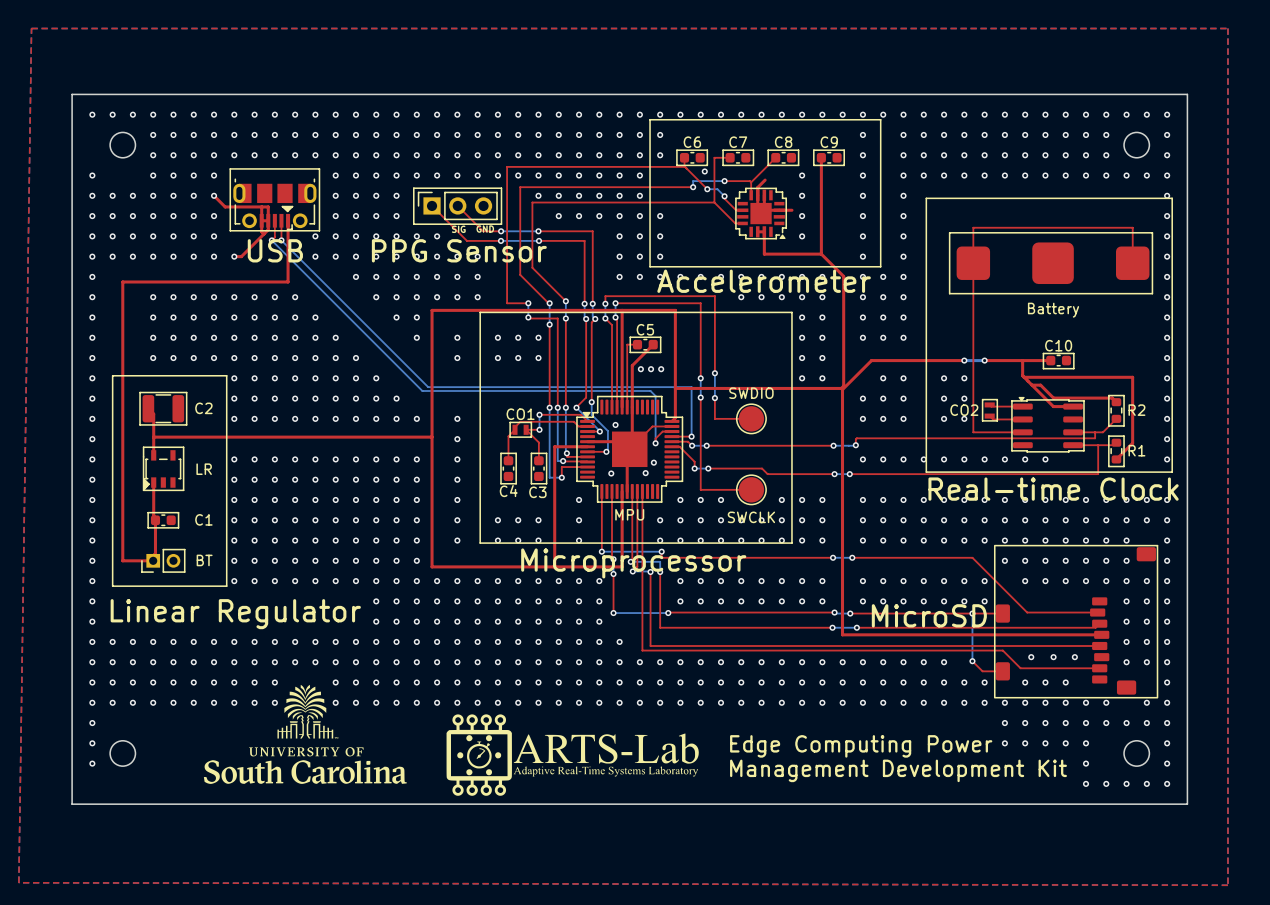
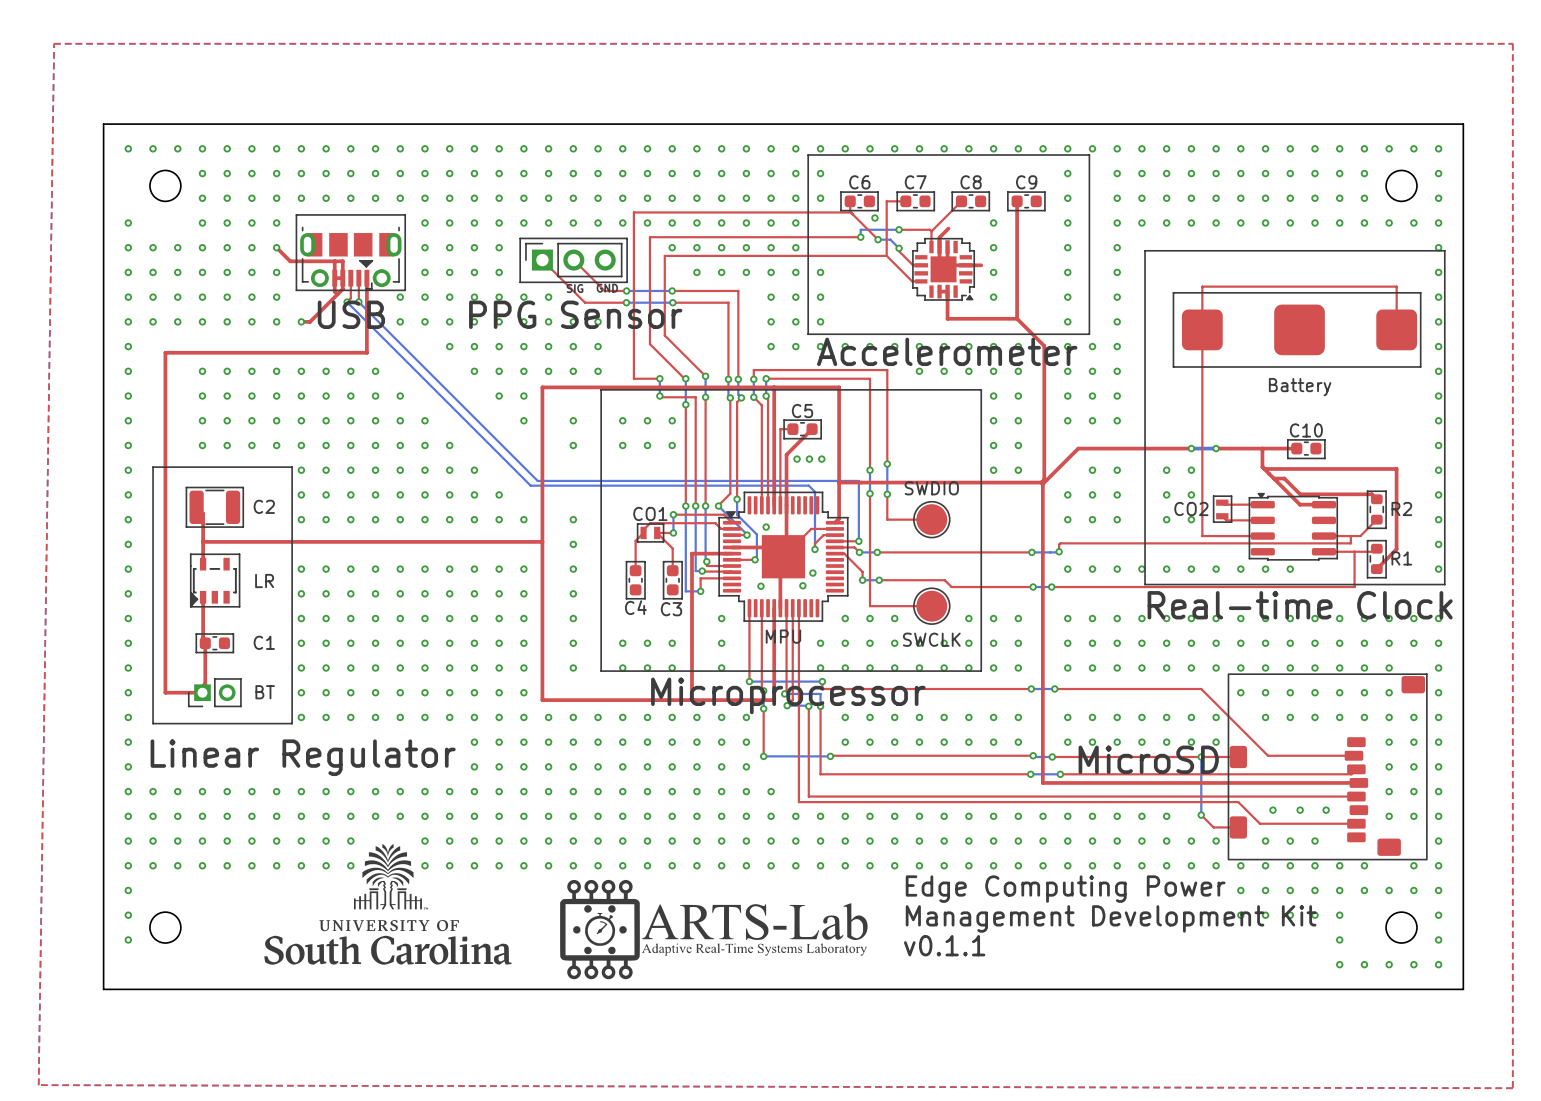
text: none -> Edge Computing Power (1065, 889)
text: Edge Computing Power (861, 746) -> Management Development Kit (1111, 918)
text: Management Development Kit (898, 770) -> v0.1.1 (944, 945)

